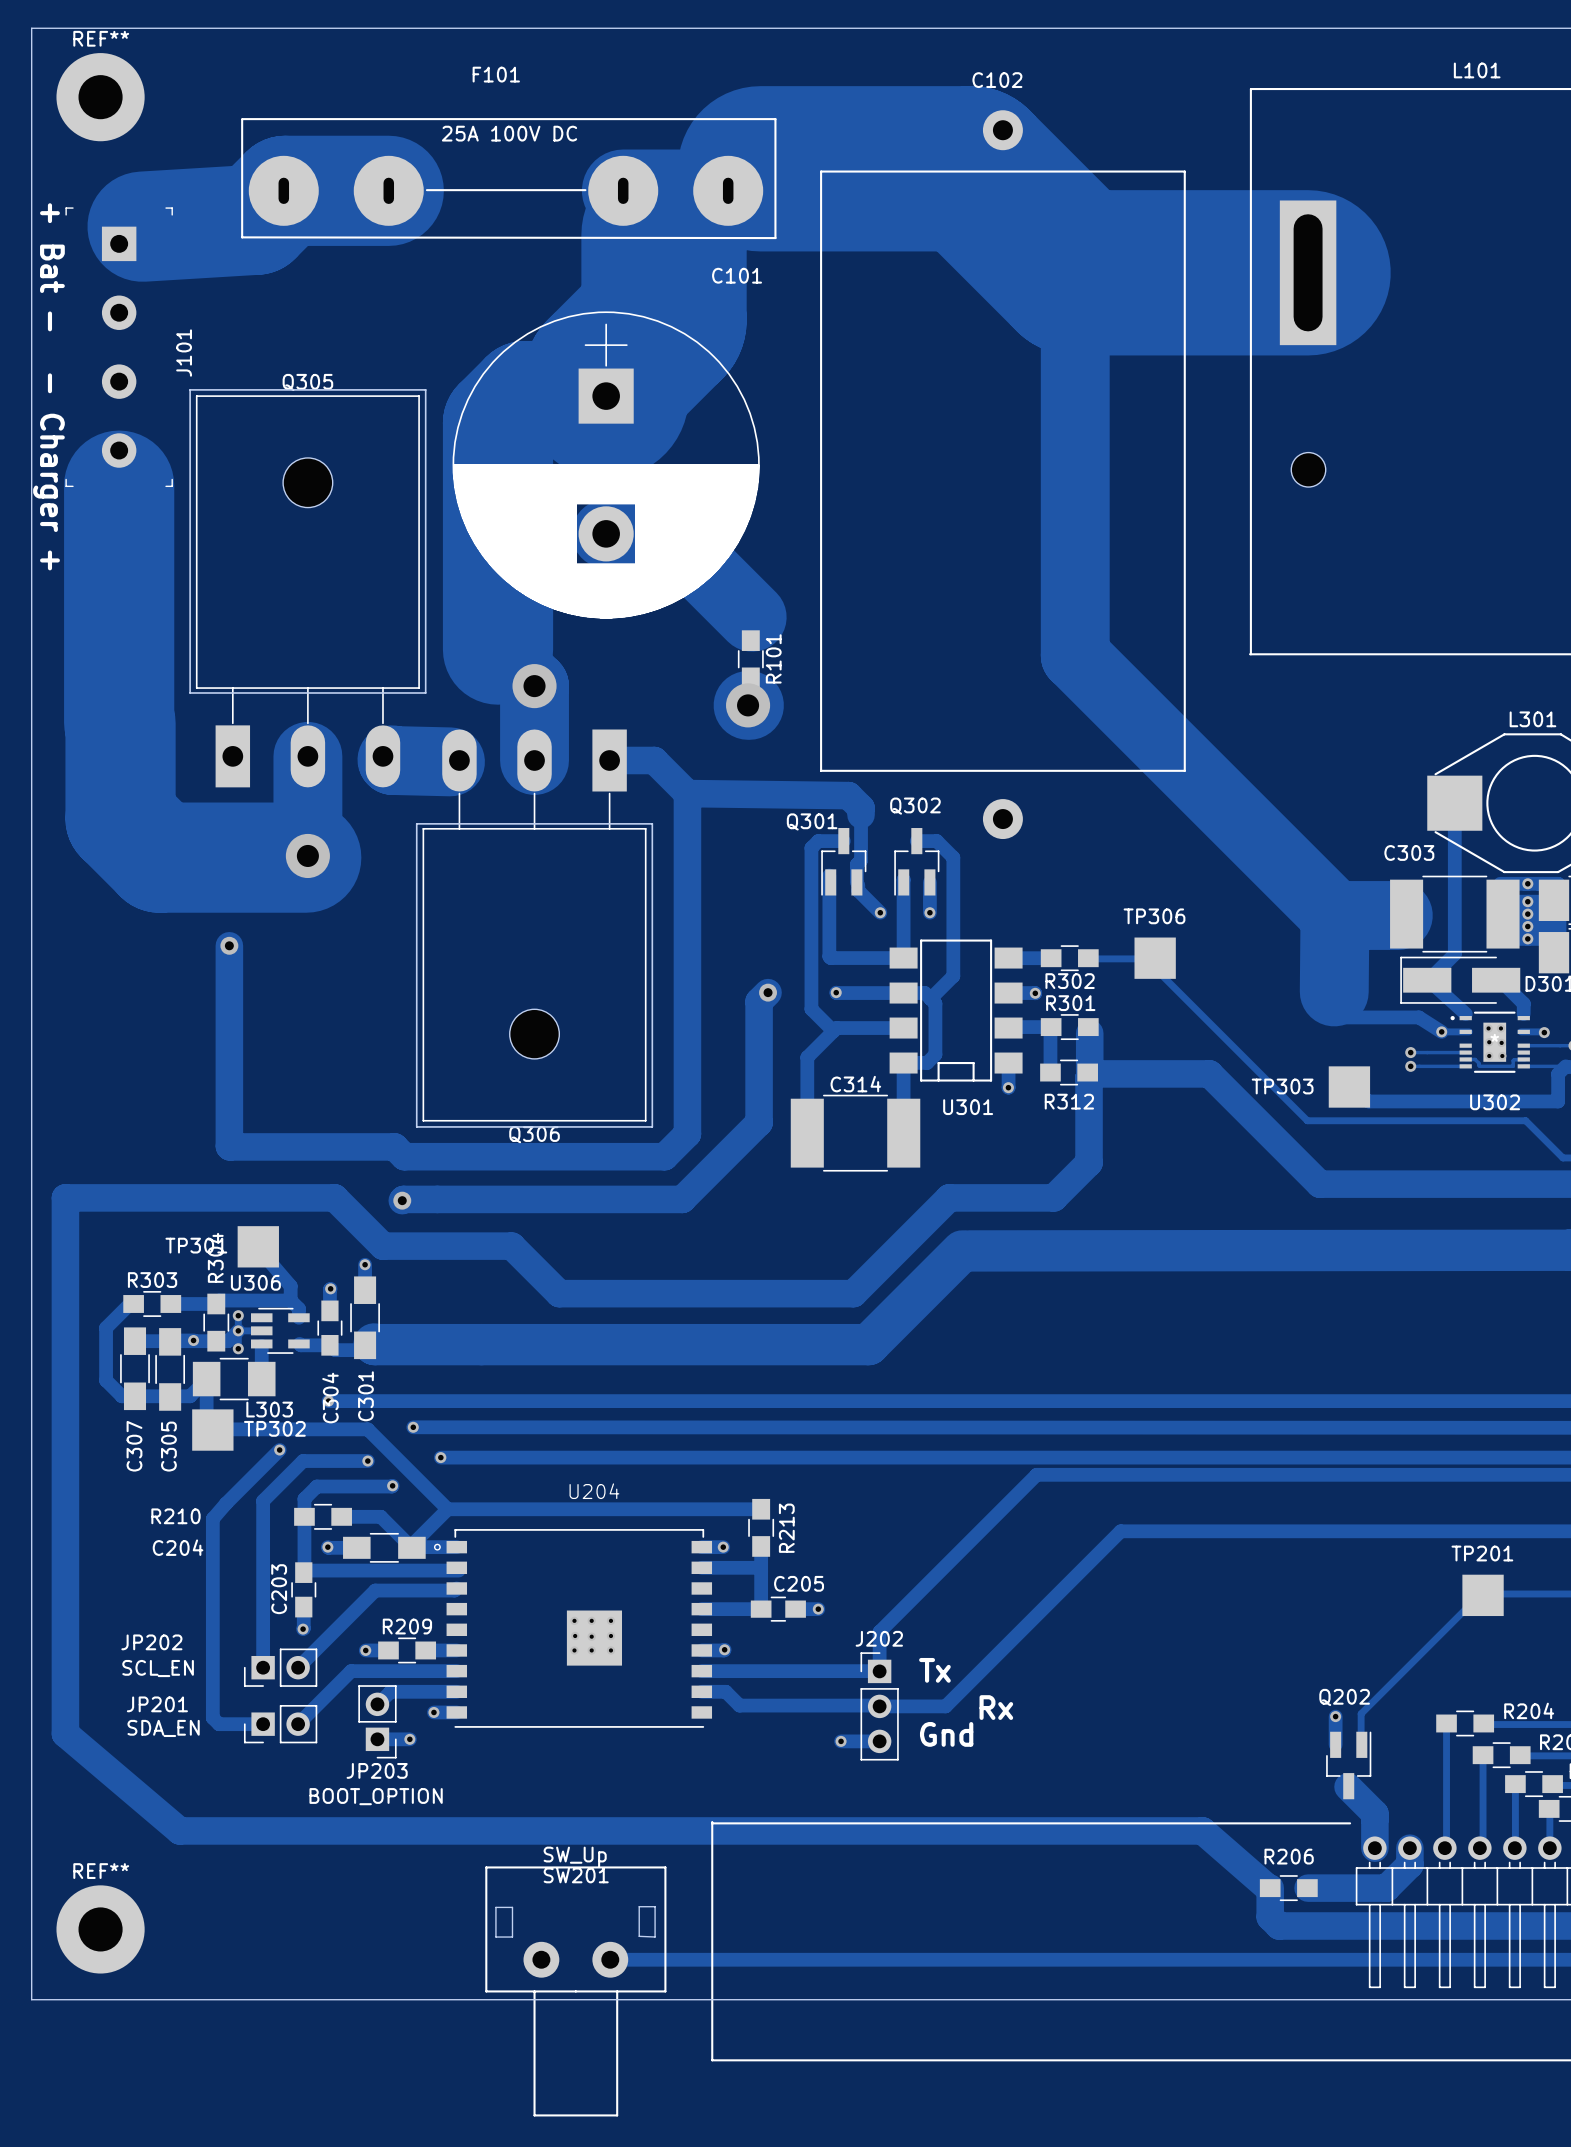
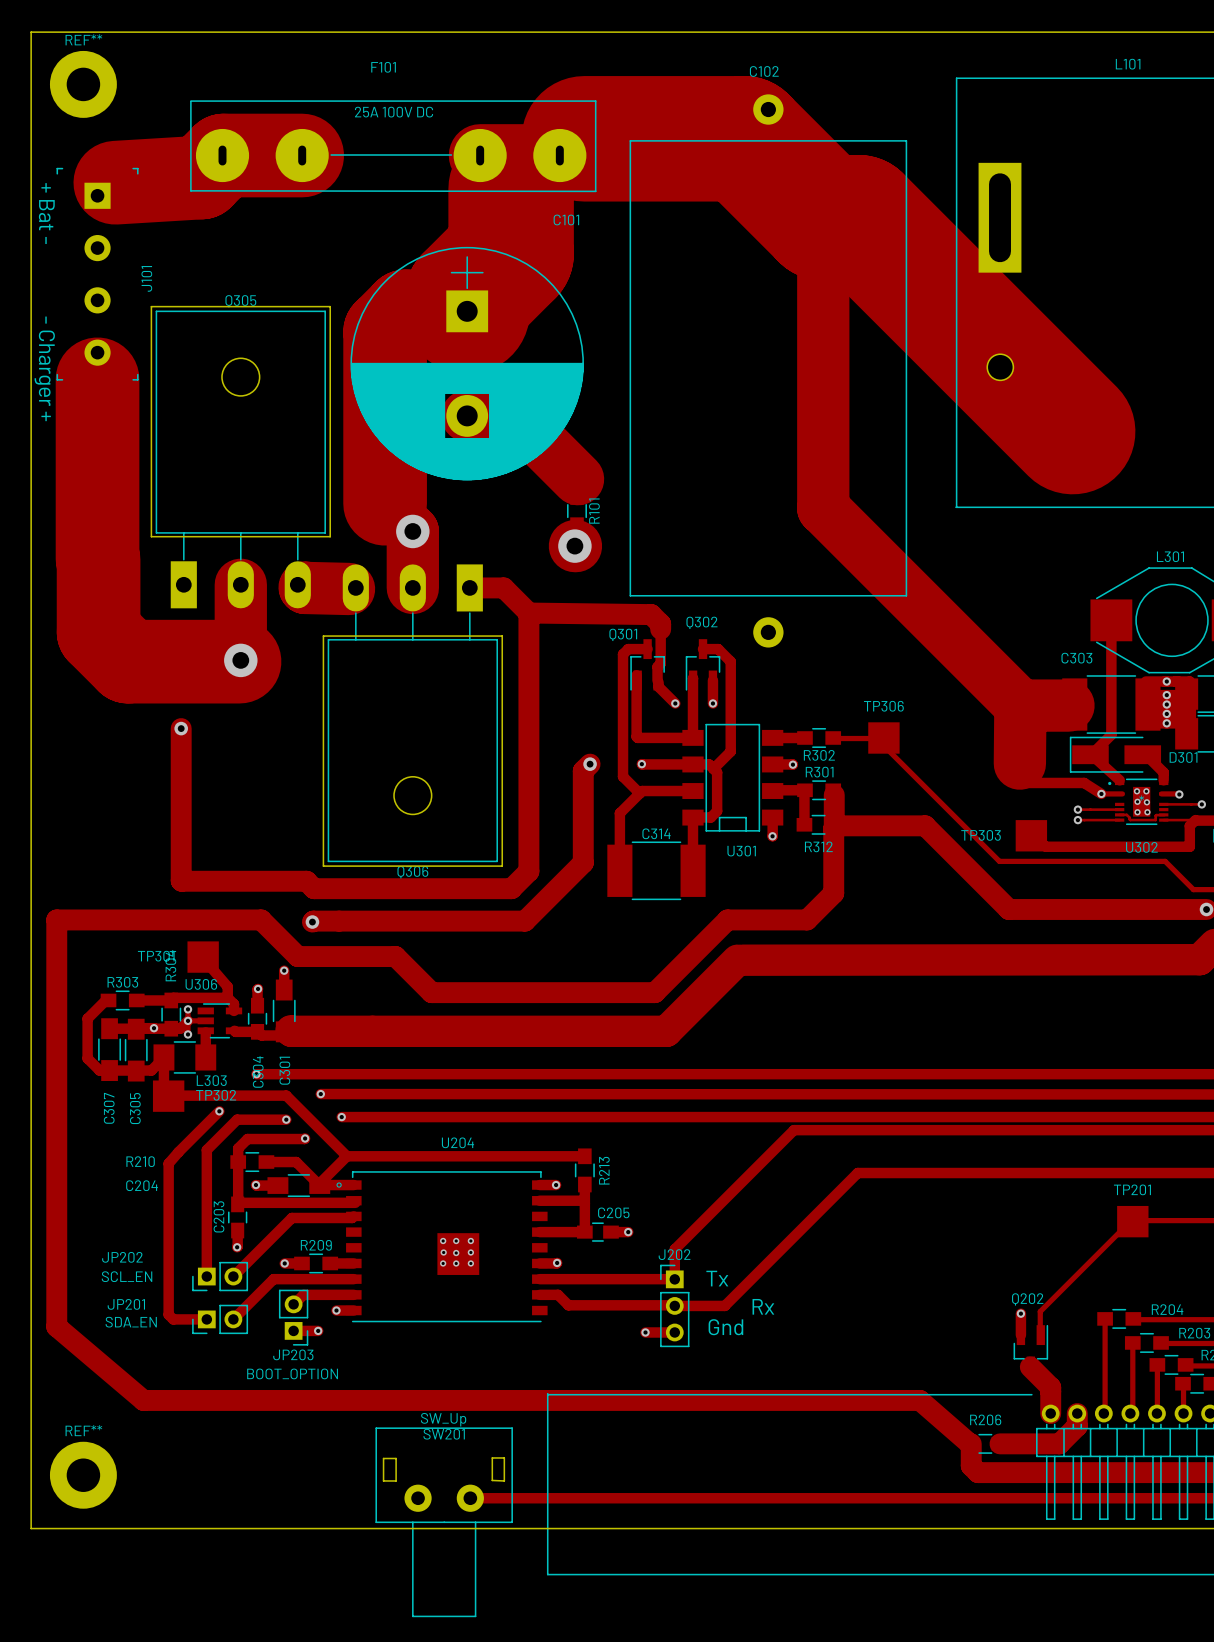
track: (1122, 272) (1308, 274) -> (858, 217) (1072, 431)

